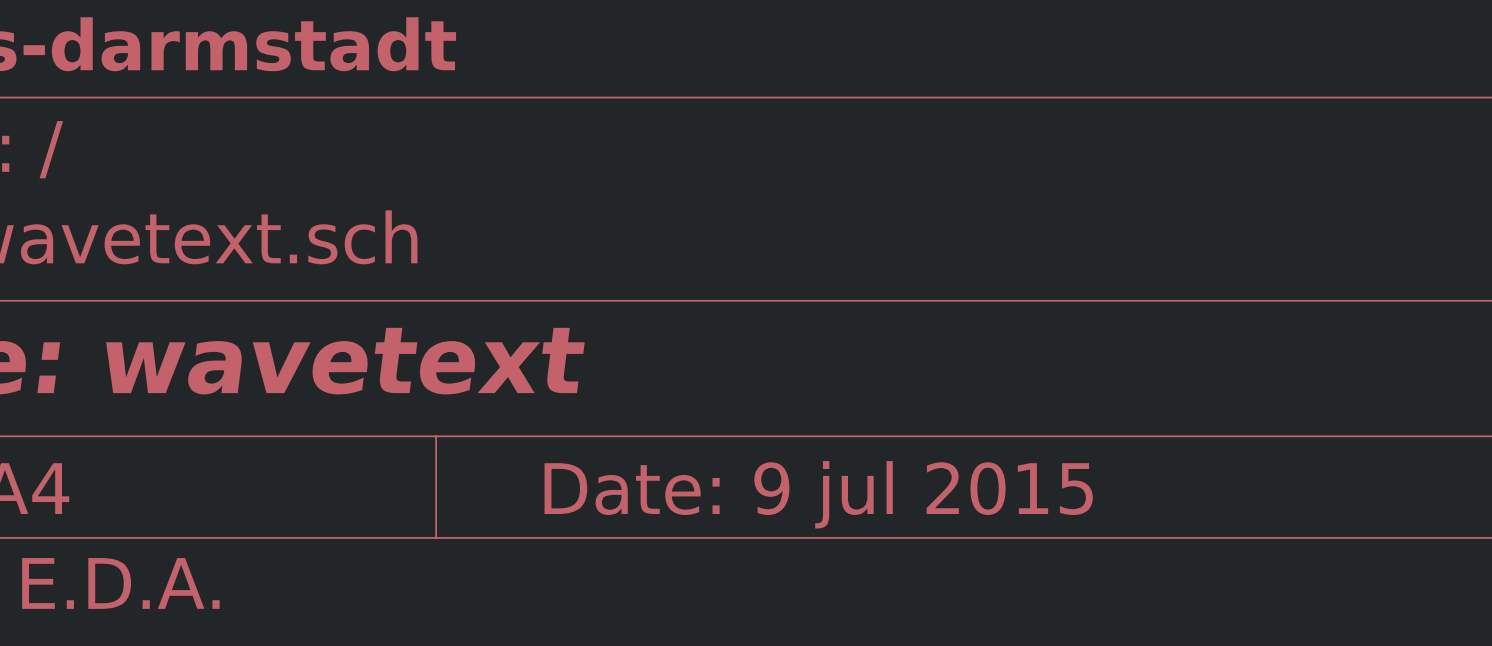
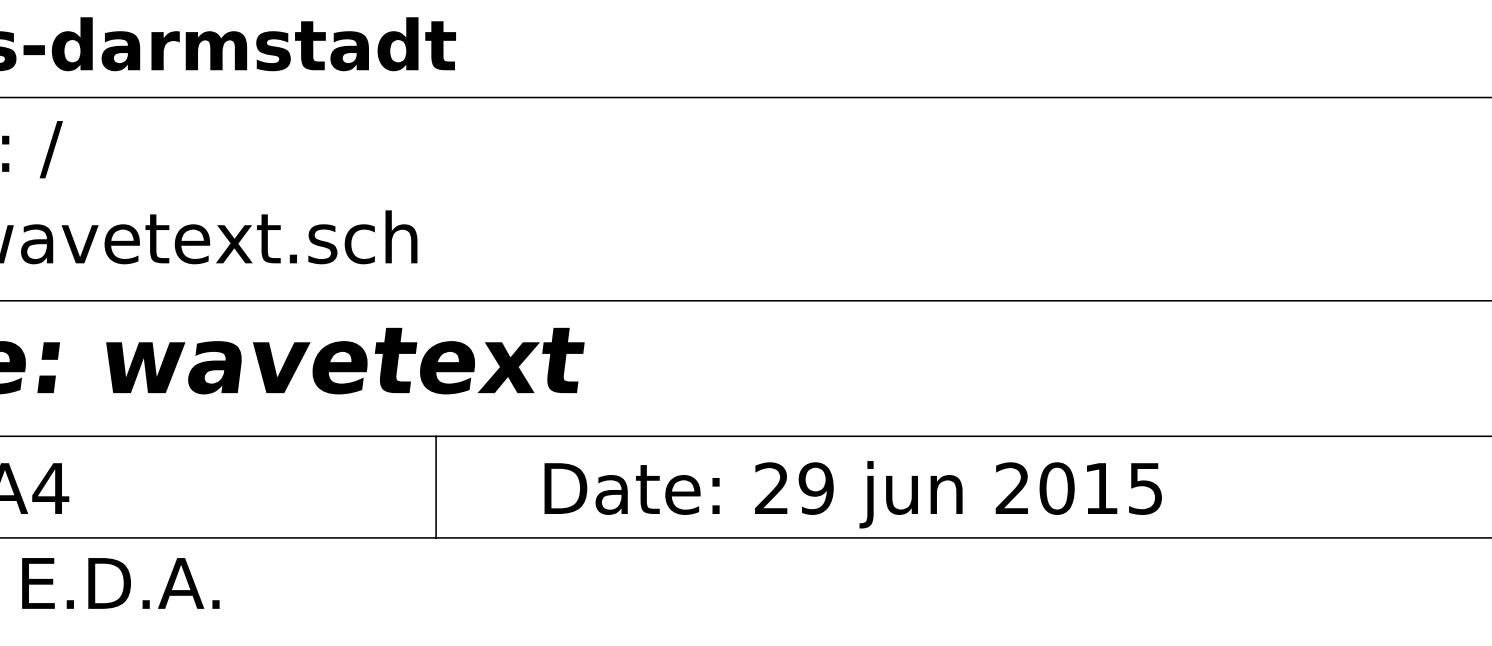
title block: Date: 9 jul 2015 (818, 494) -> Date: 29 jun 2015 (853, 494)

